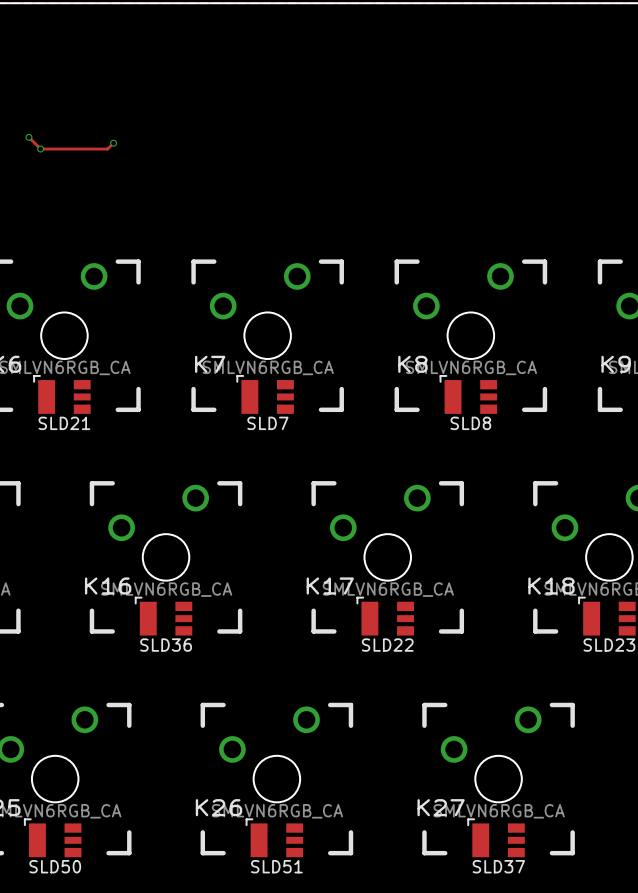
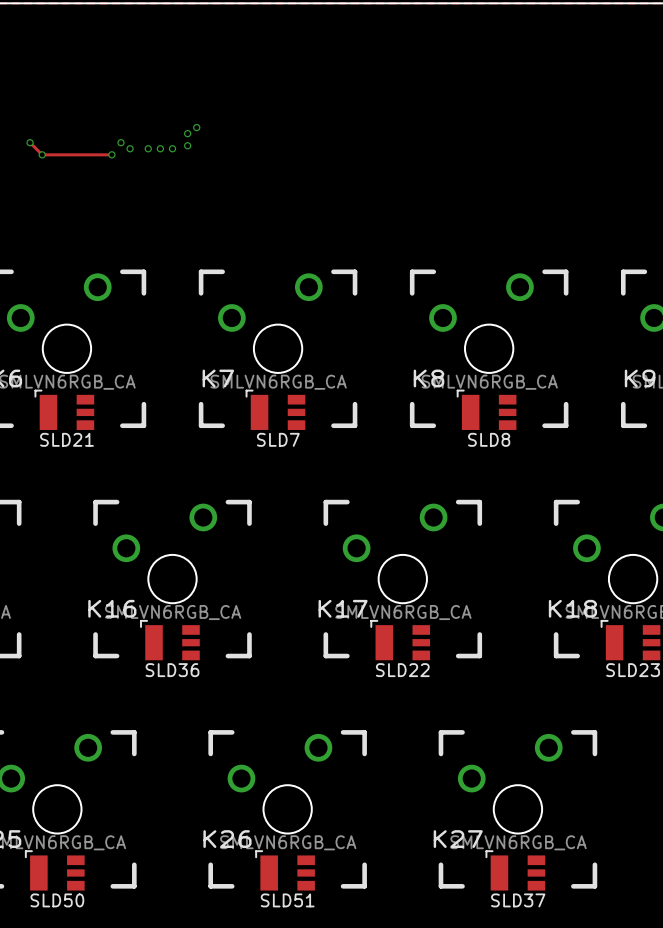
via: none -> (196, 127)
via: none -> (187, 133)
via: none -> (120, 142)
via: none -> (187, 145)
track: (113, 143) (107, 149) -> none
via: (113, 143) -> none
via: none -> (130, 148)
via: none -> (148, 148)
via: none -> (160, 148)
via: none -> (172, 148)
via: none -> (111, 154)

